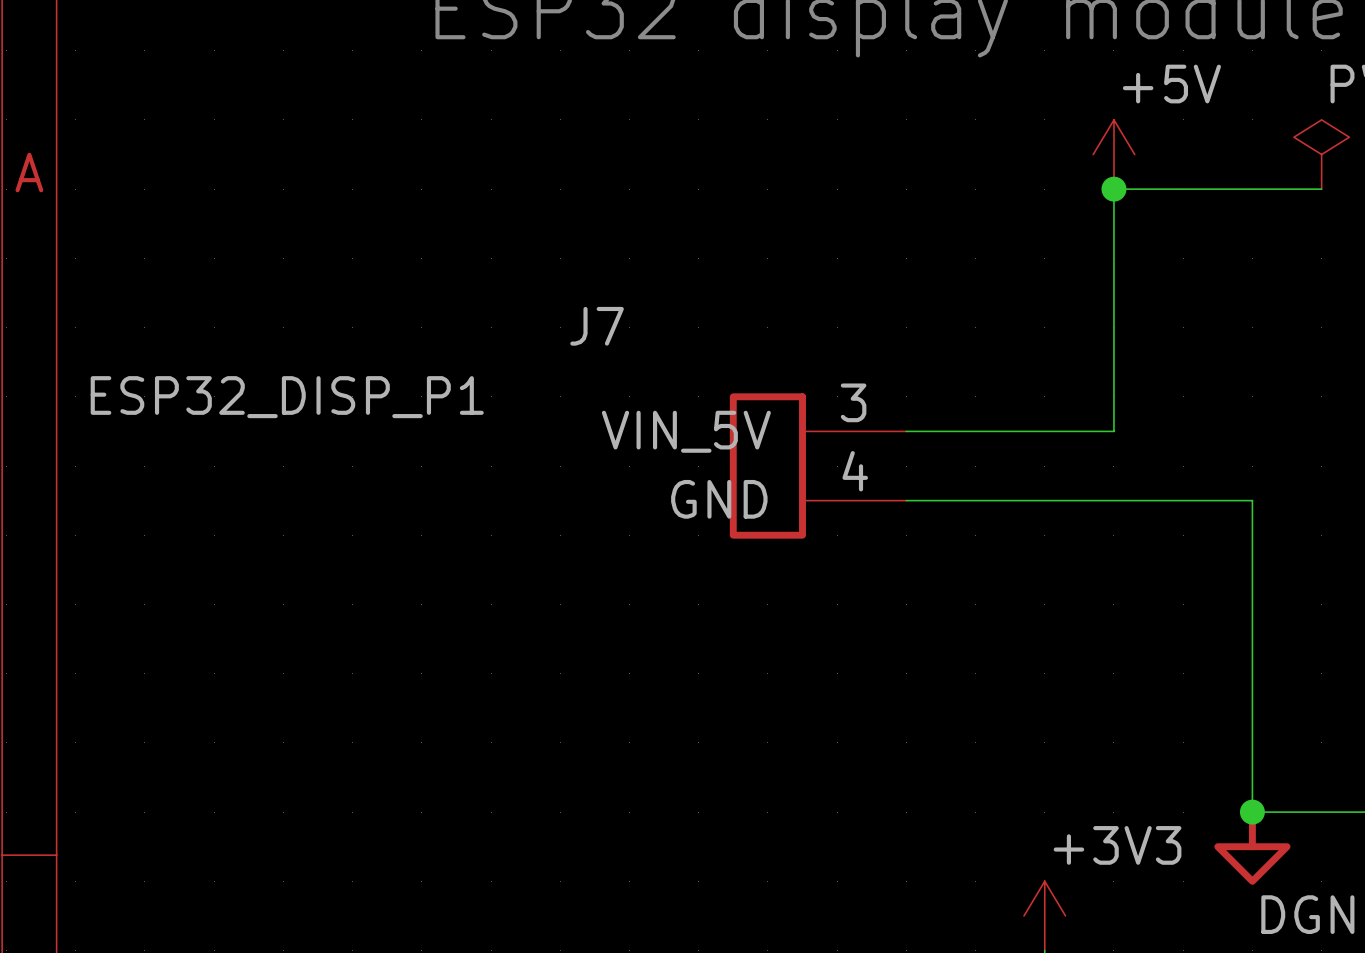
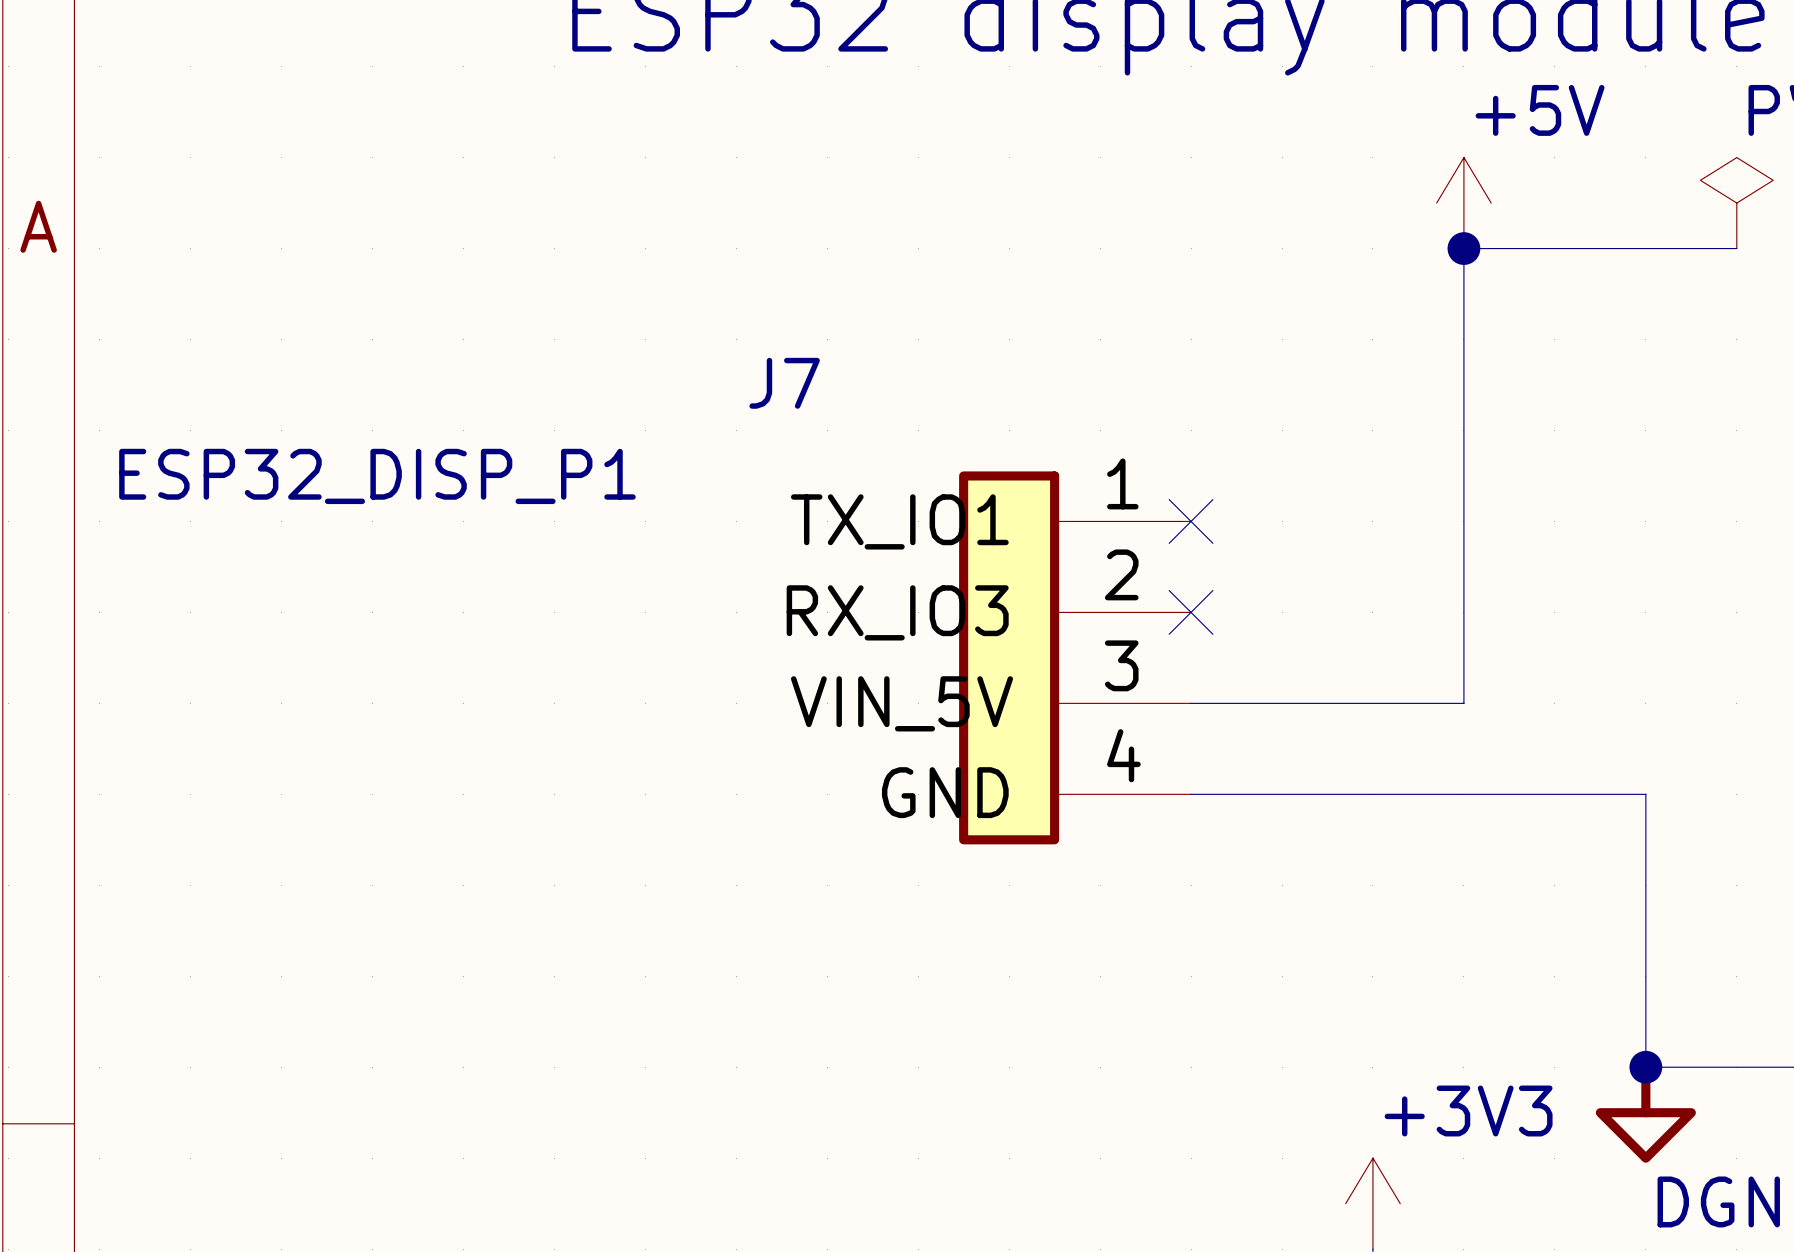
J7 name position: J7 (597, 326) -> J7 (784, 383)
J7 symbol: [729, 393, 907, 539] -> [959, 471, 1192, 845]
no-connect mark: none -> (1191, 521)
J7 value position: ESP32_DISP_P1 (287, 397) -> ESP32_DISP_P1 (377, 476)
wire: (906, 431) (1113, 431) -> (1191, 703) (1463, 703) (1463, 566)
no-connect mark: none -> (1191, 612)
wire: (906, 500) (1252, 500) (1252, 604) -> (1191, 794) (1645, 794)

